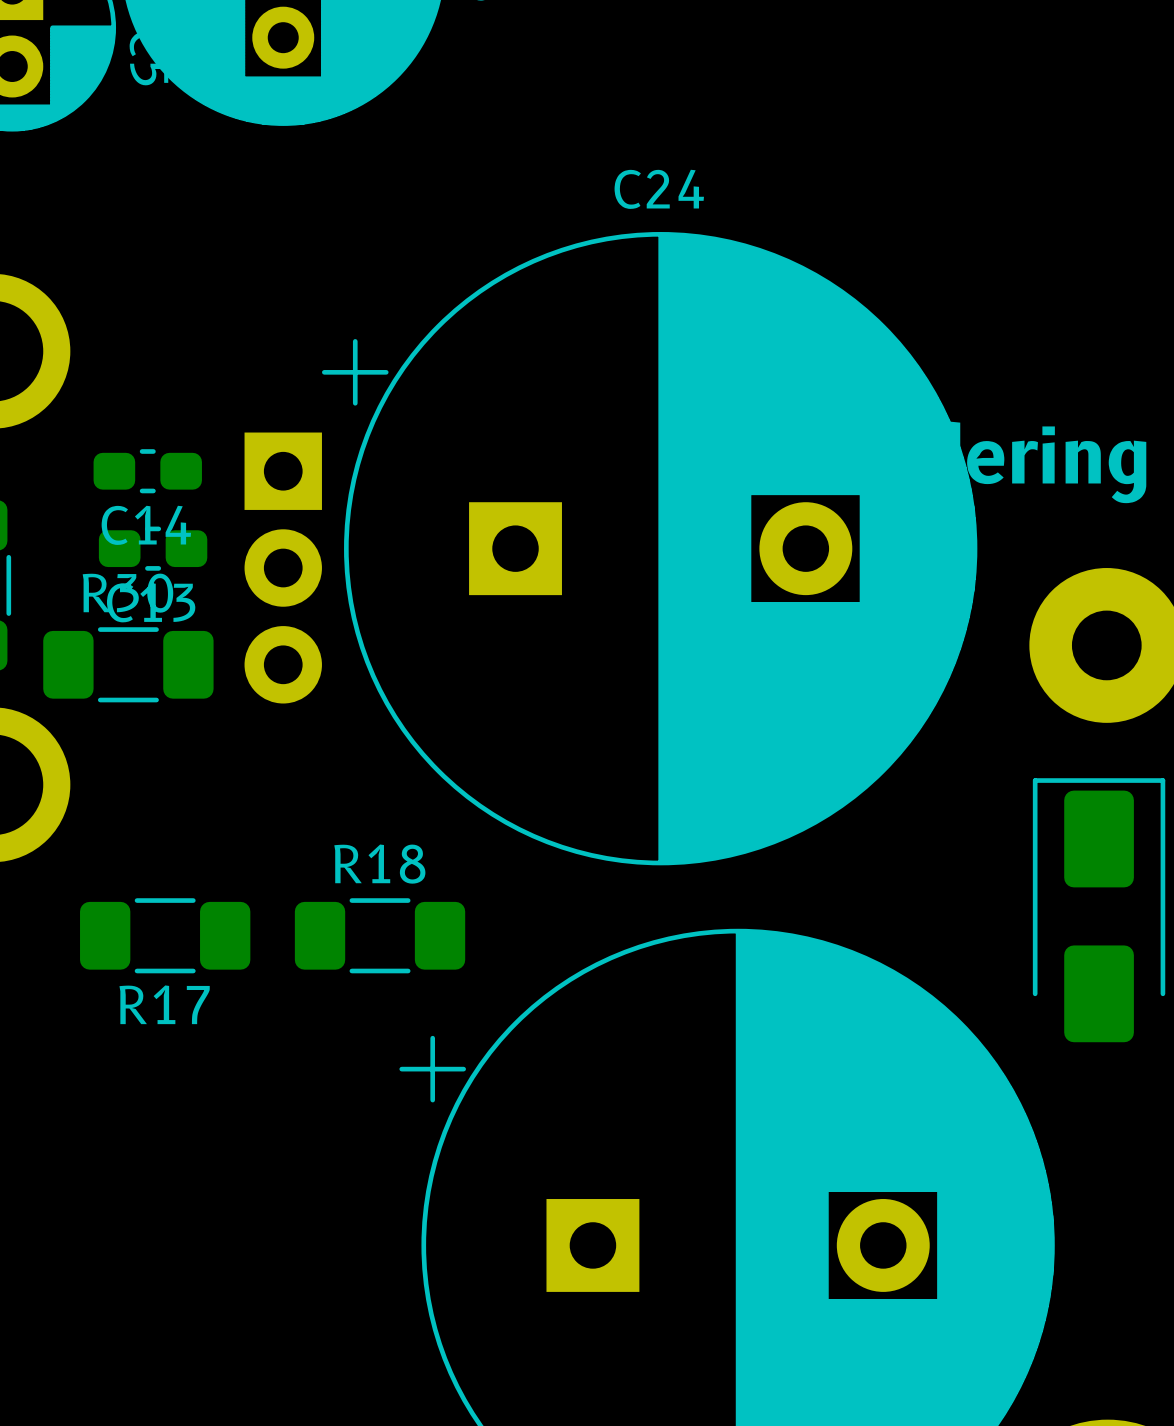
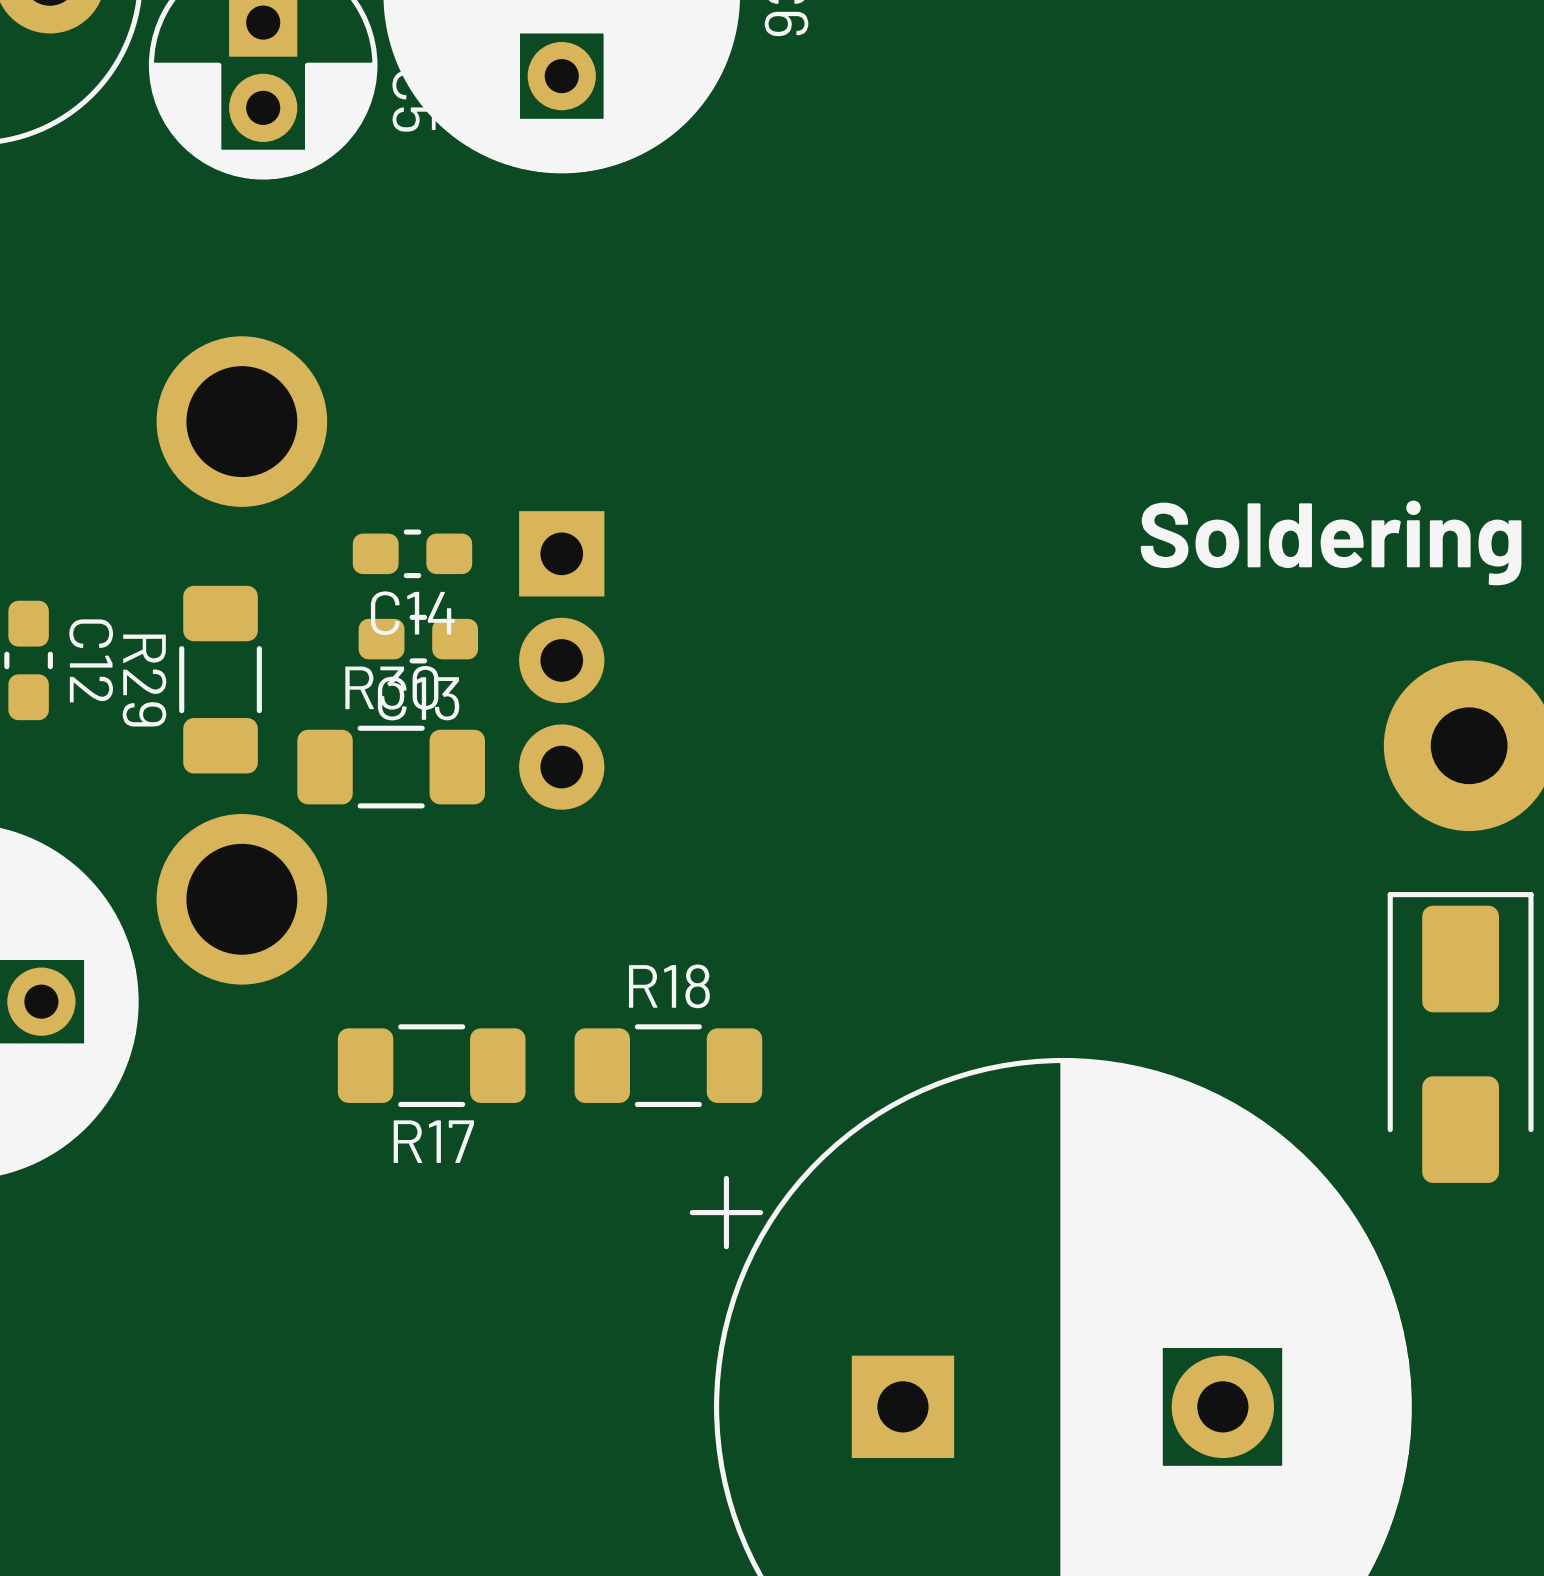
C24: (649, 548) -> none

